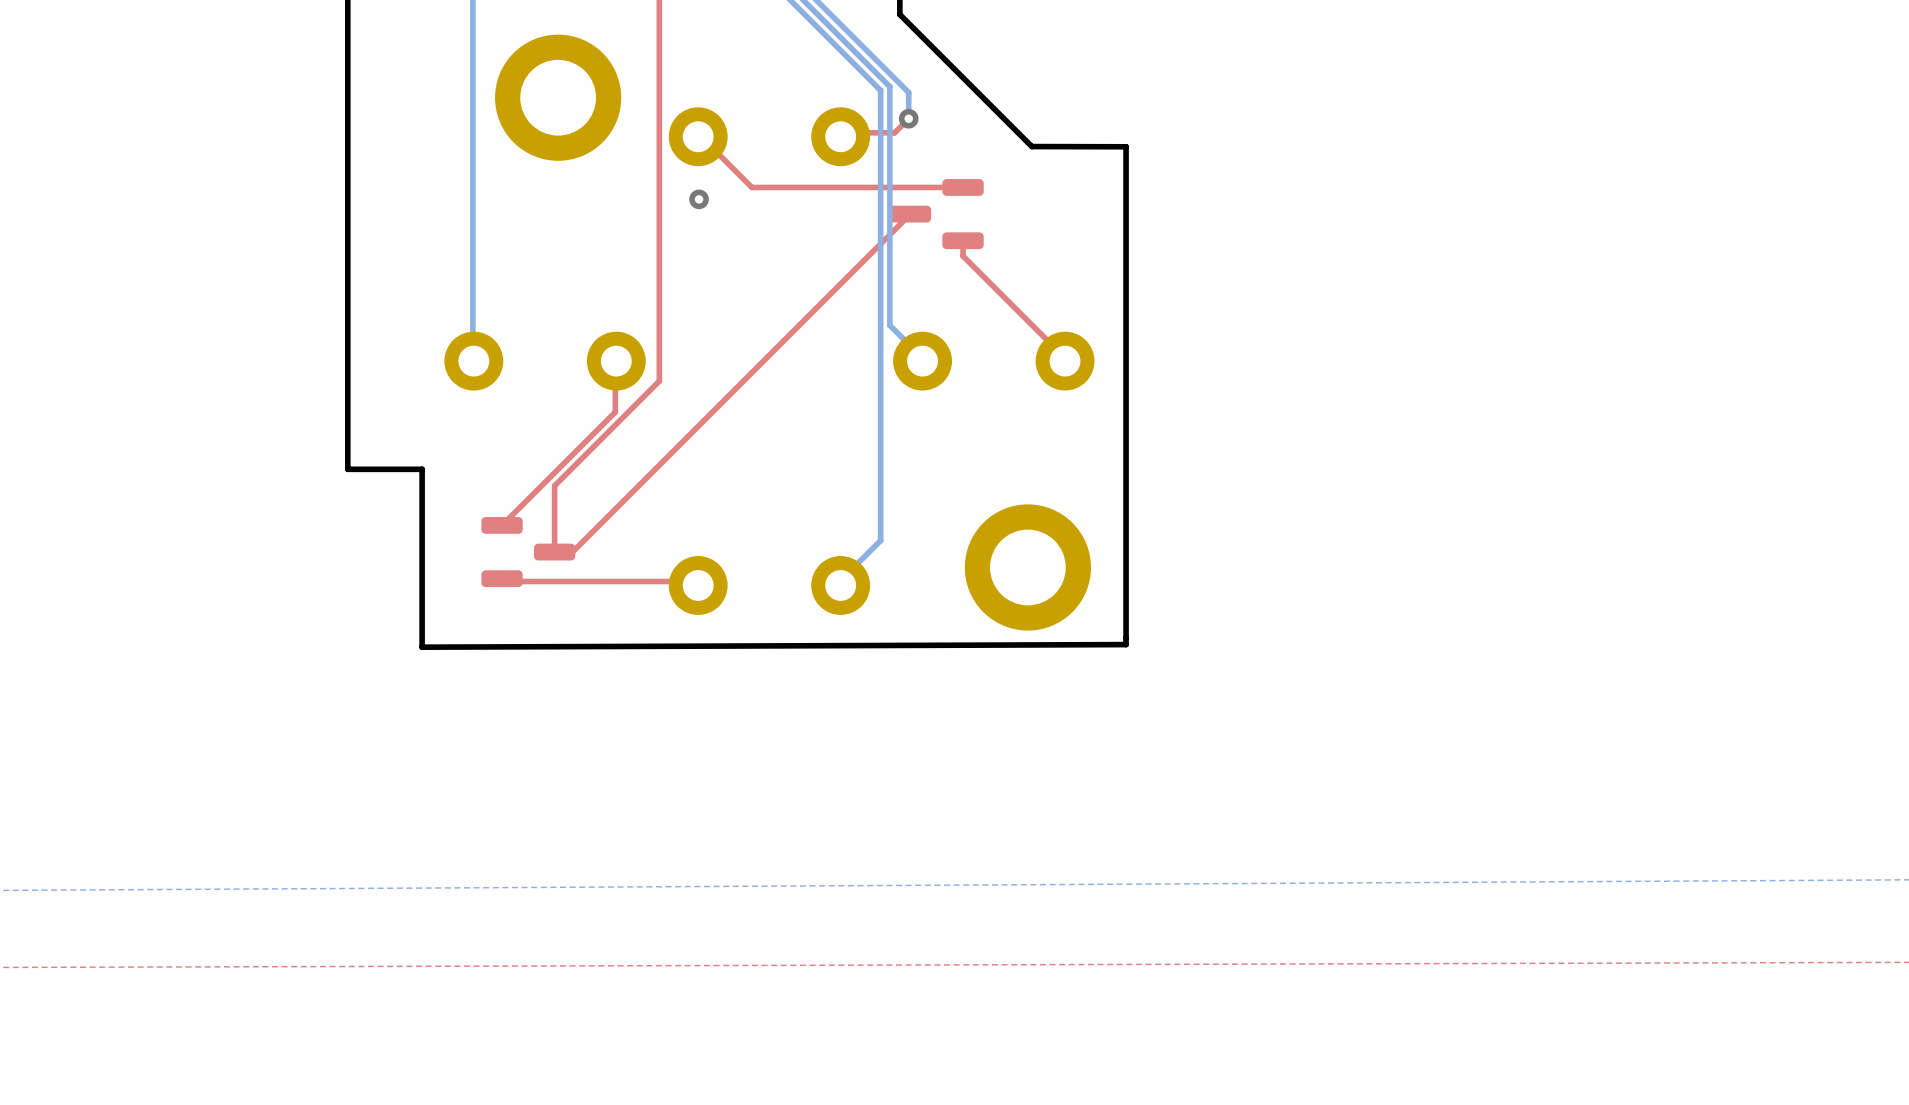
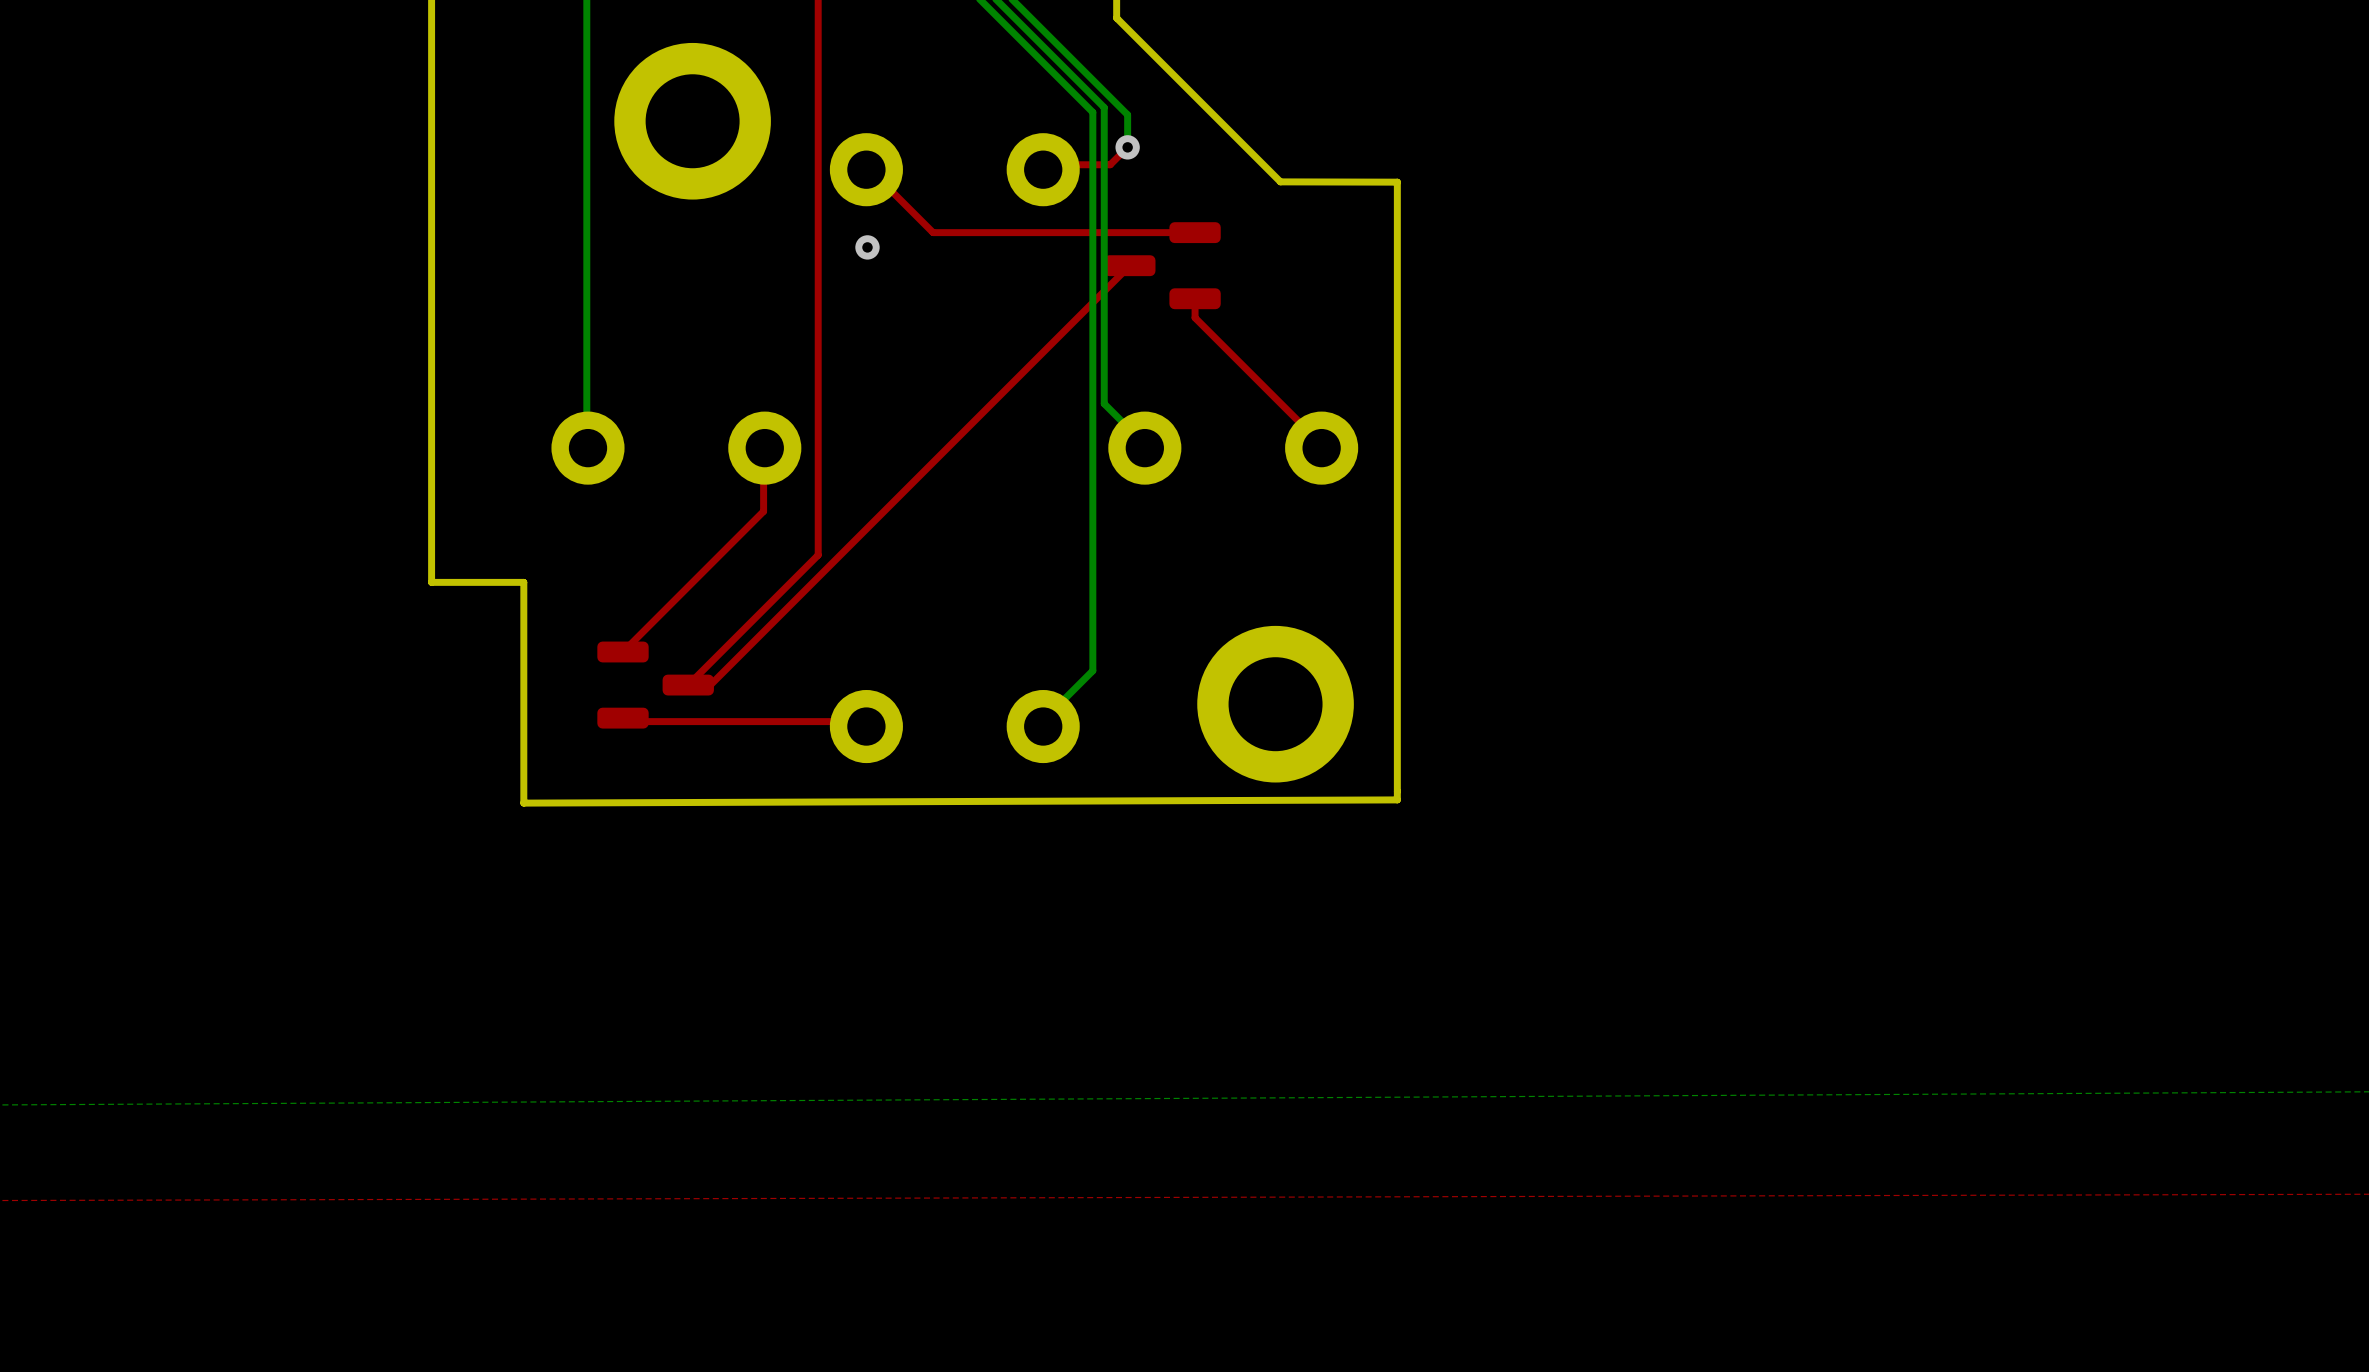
top track: (659, 381) (554, 485) (554, 552) -> (818, 472) (818, 555) (688, 685)

